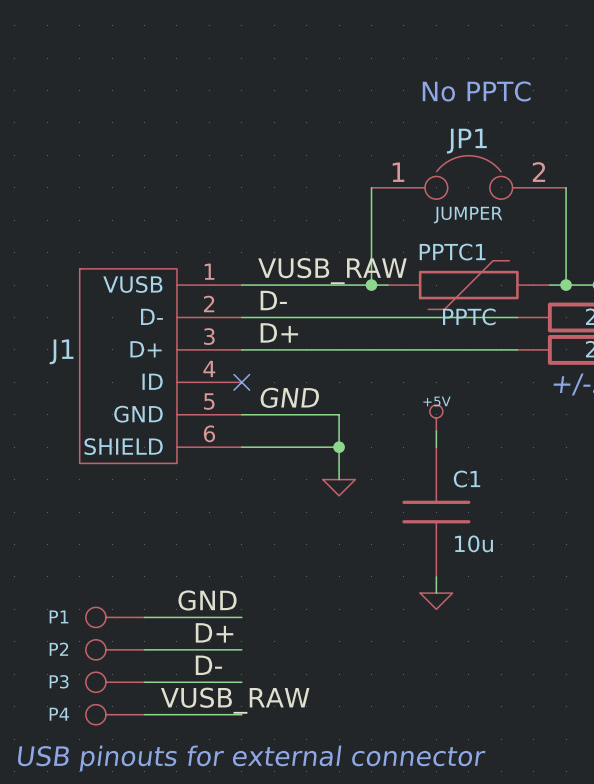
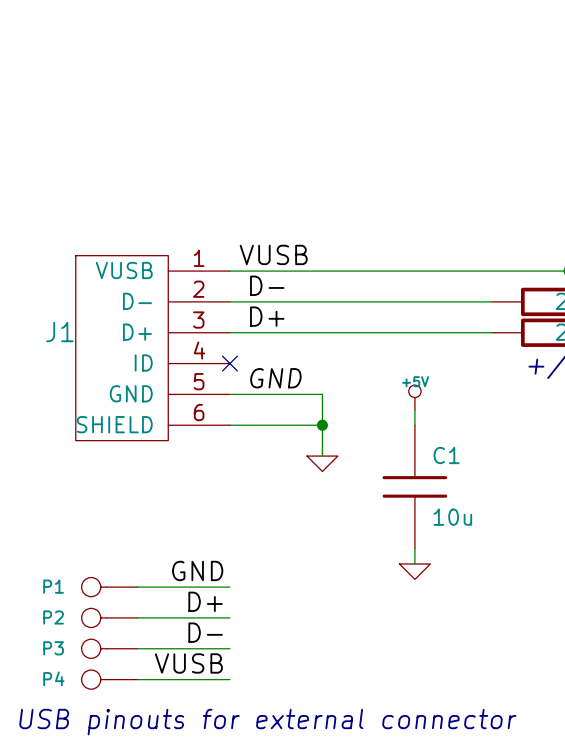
text: No PPTC (476, 91) -> none
JP1: JUMPER (468, 177) -> none
wire: (371, 187) (371, 285) -> none
wire: (566, 187) (566, 285) -> none
label: VUSB_RAW (332, 271) -> VUSB (273, 254)
junction: (371, 285) -> none
wire: none -> (368, 271) (522, 271)
PPTC1: PPTC (468, 285) -> none
junction: (566, 285) -> none
label: VUSB_RAW (235, 700) -> VUSB (188, 663)

